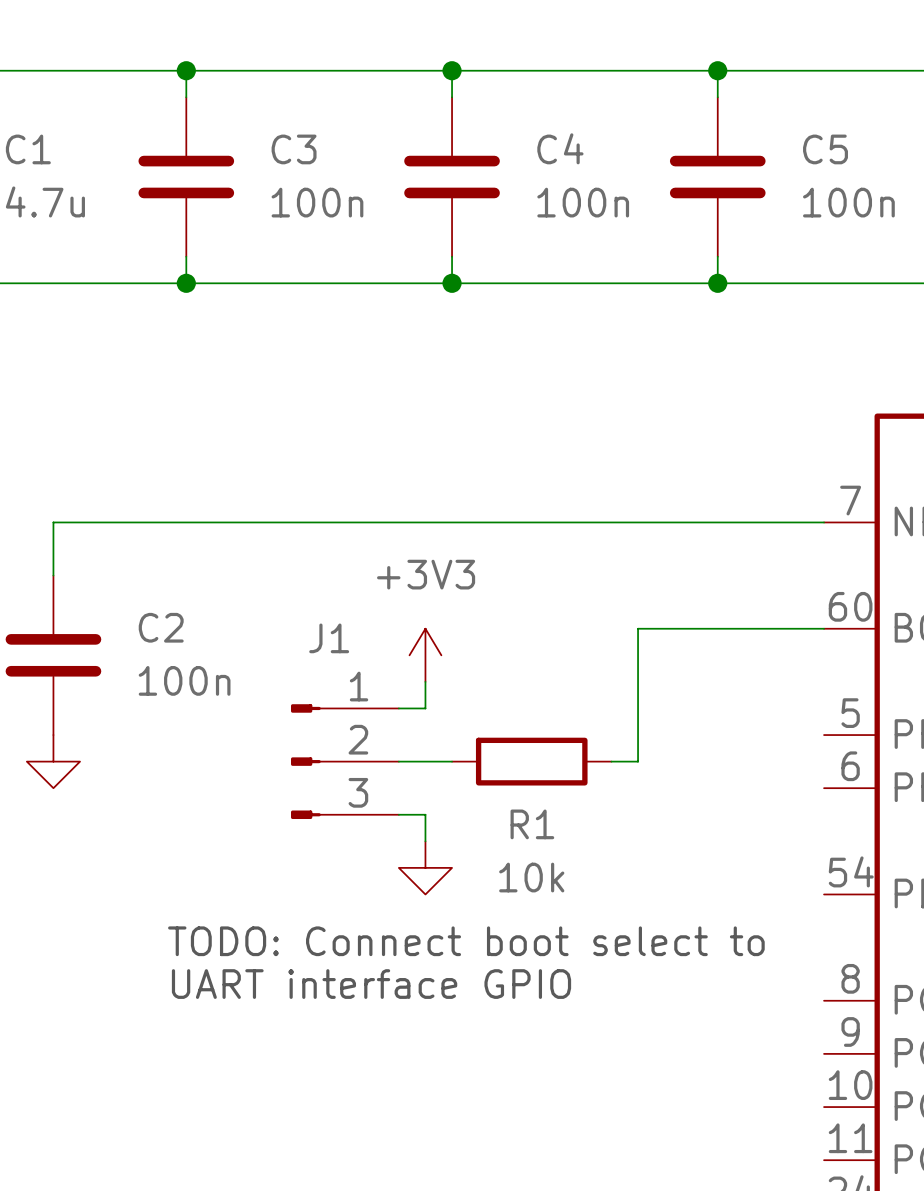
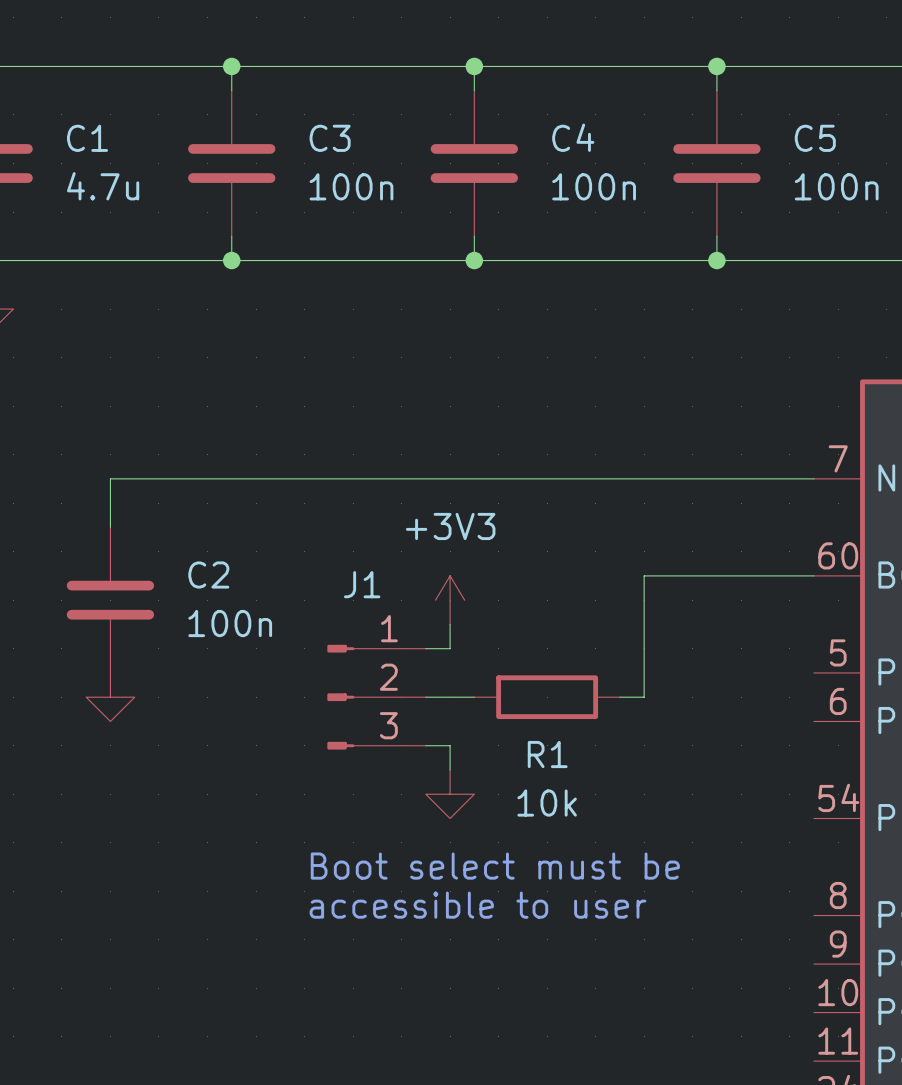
text: TODO: Connect boot select to (466, 941) -> none
text: none -> Boot select must be (495, 866)
text: UART interface GPIO (371, 984) -> none
text: none -> accessible to user (477, 905)

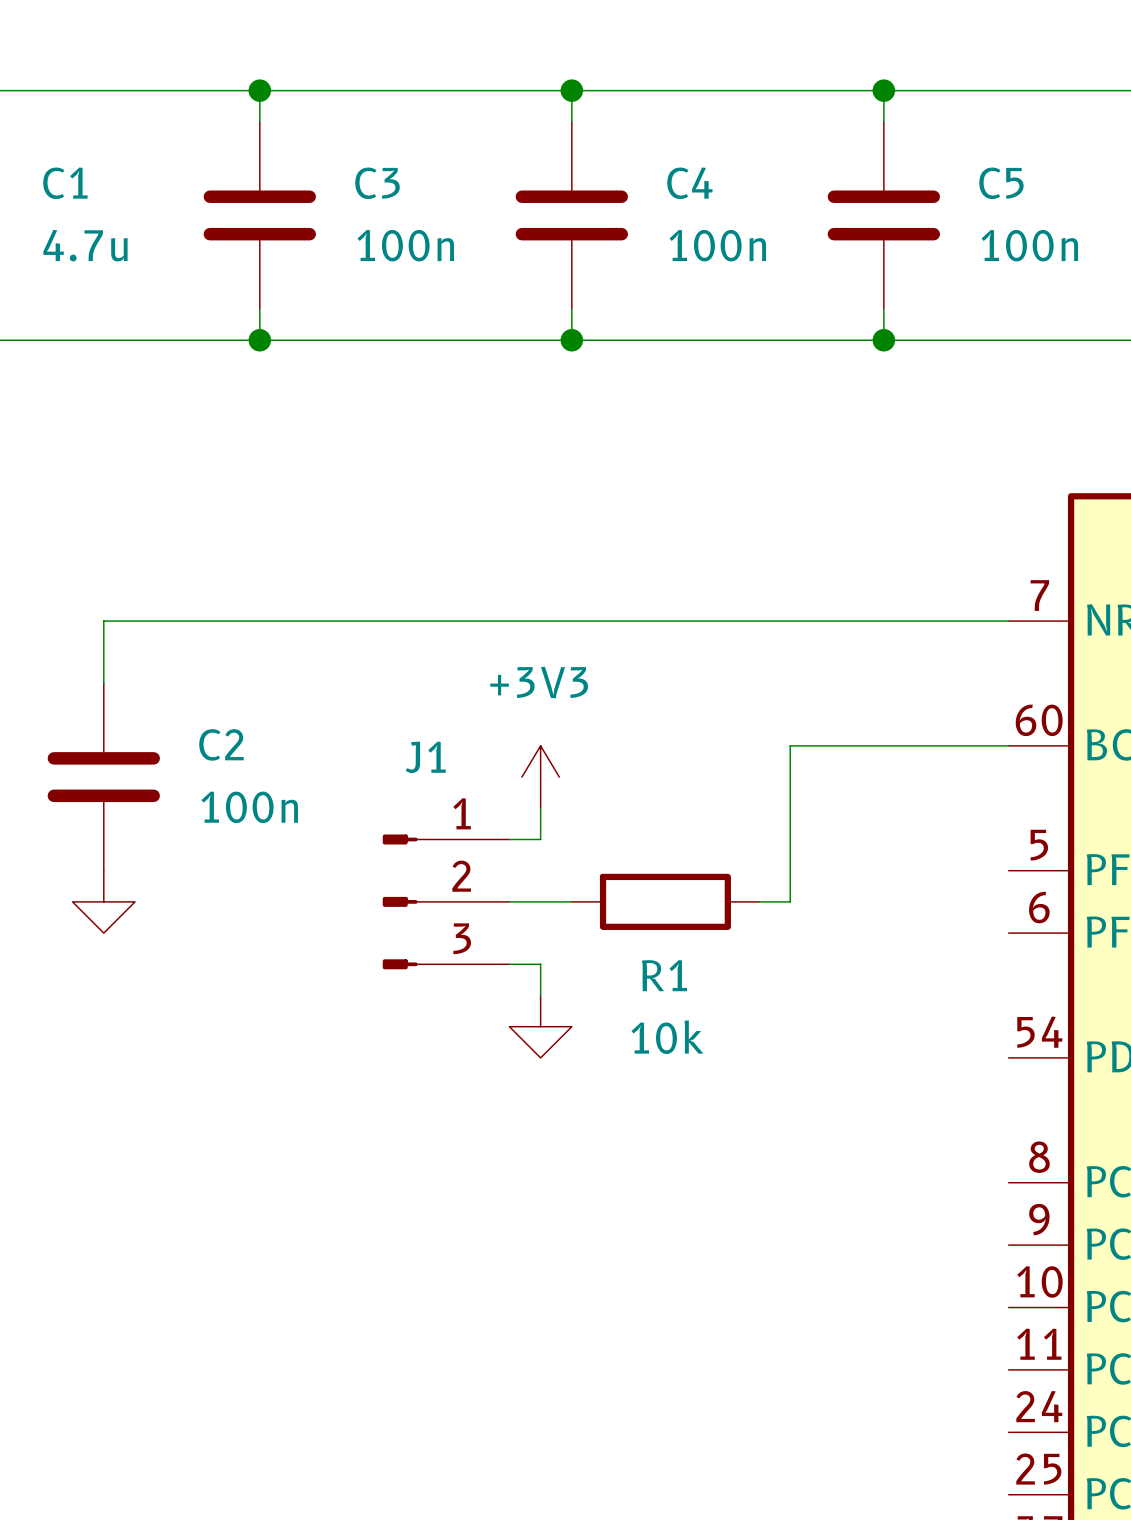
text: Boot select must be (495, 866) -> none
text: accessible to user (477, 905) -> none

